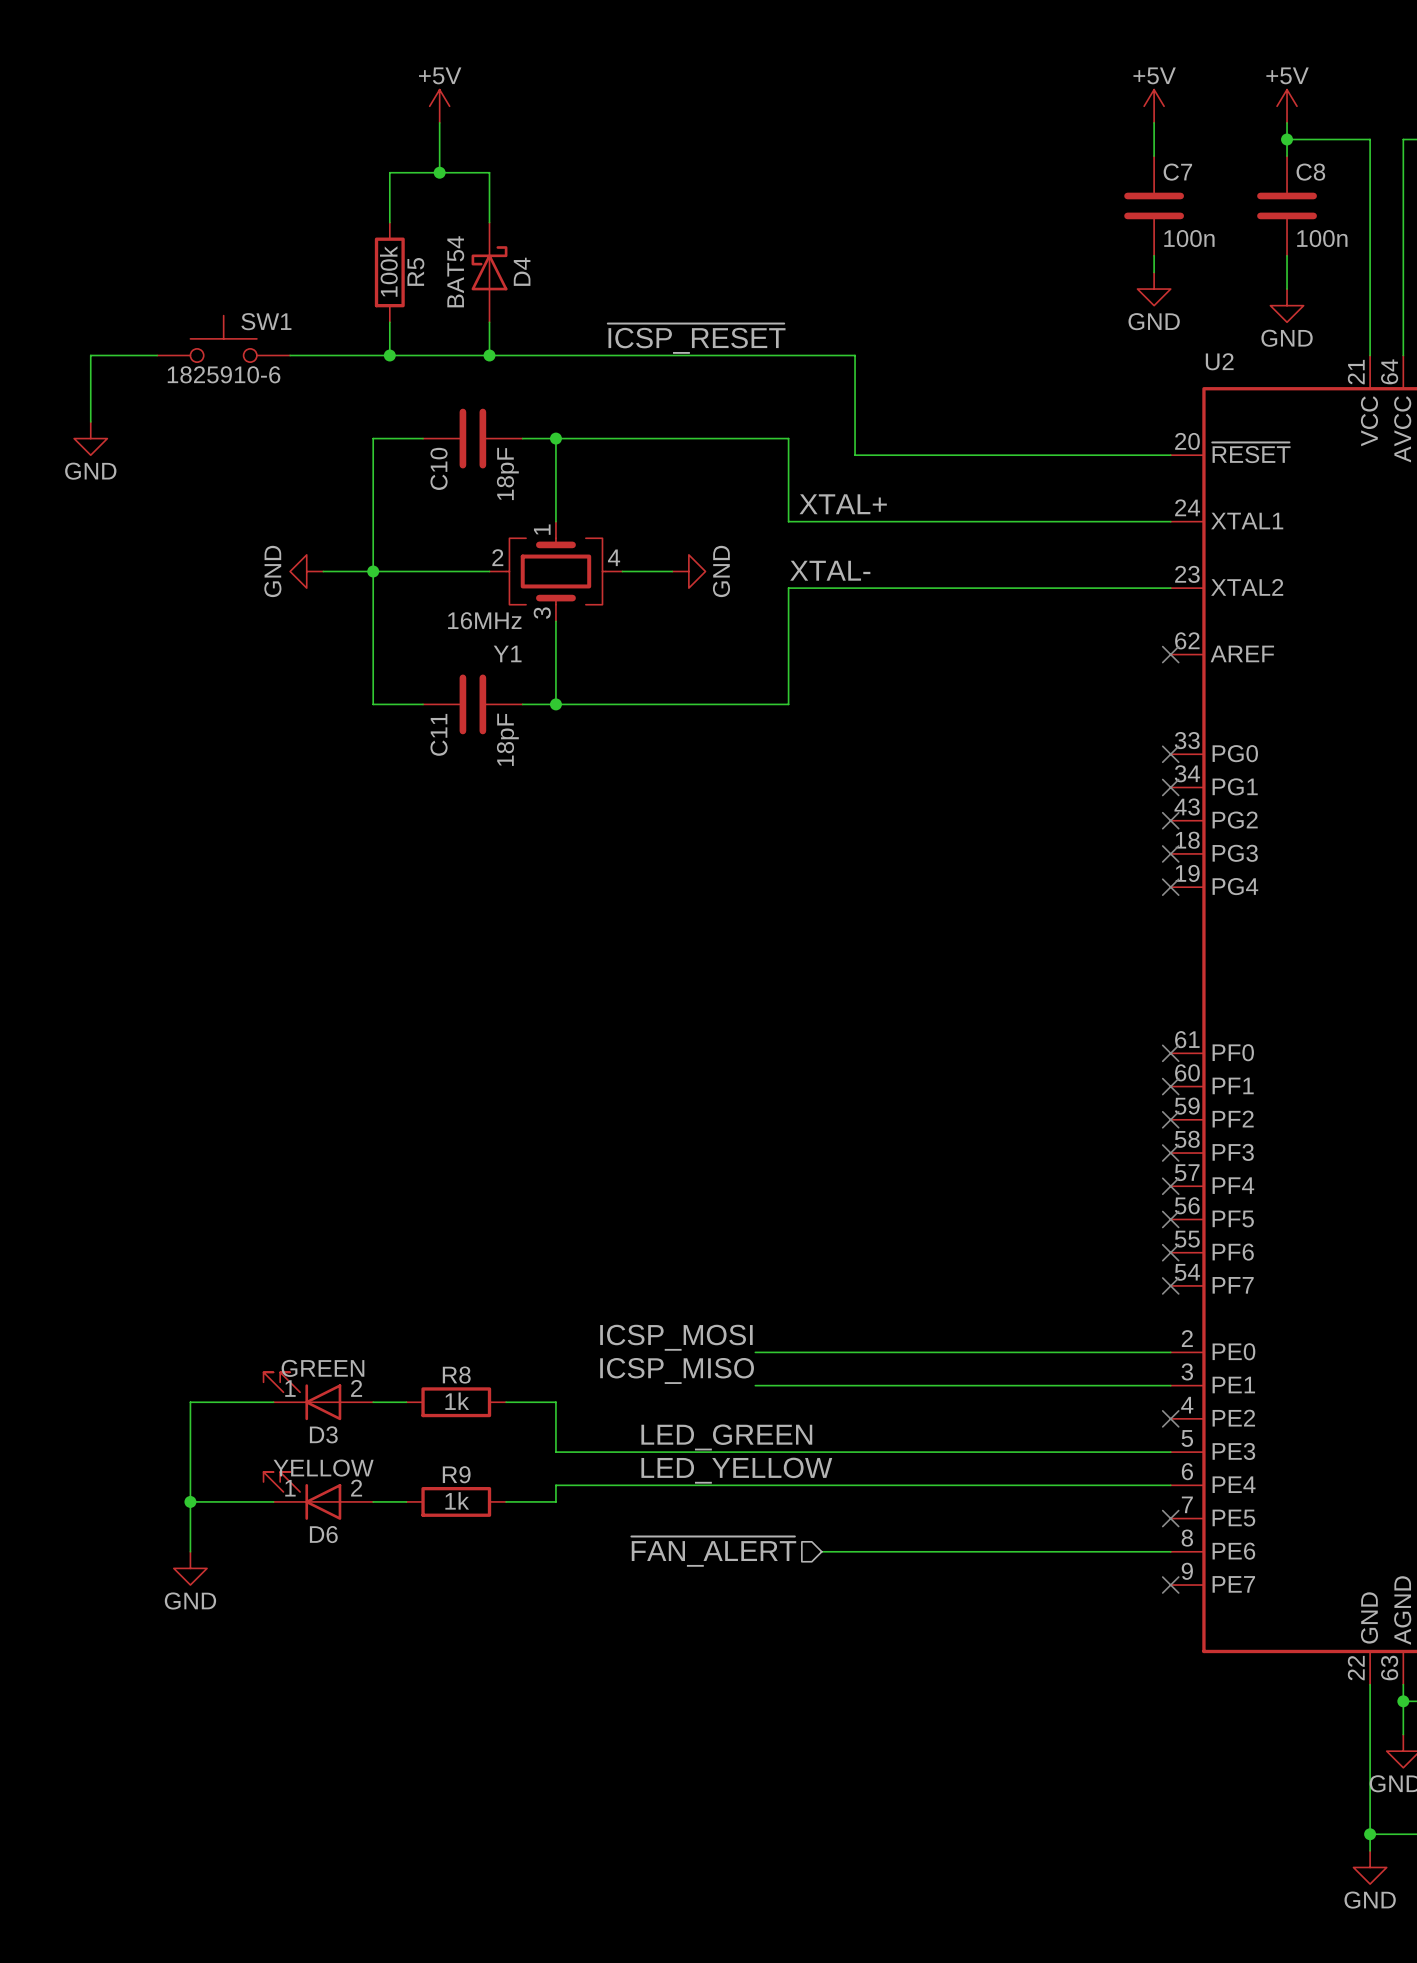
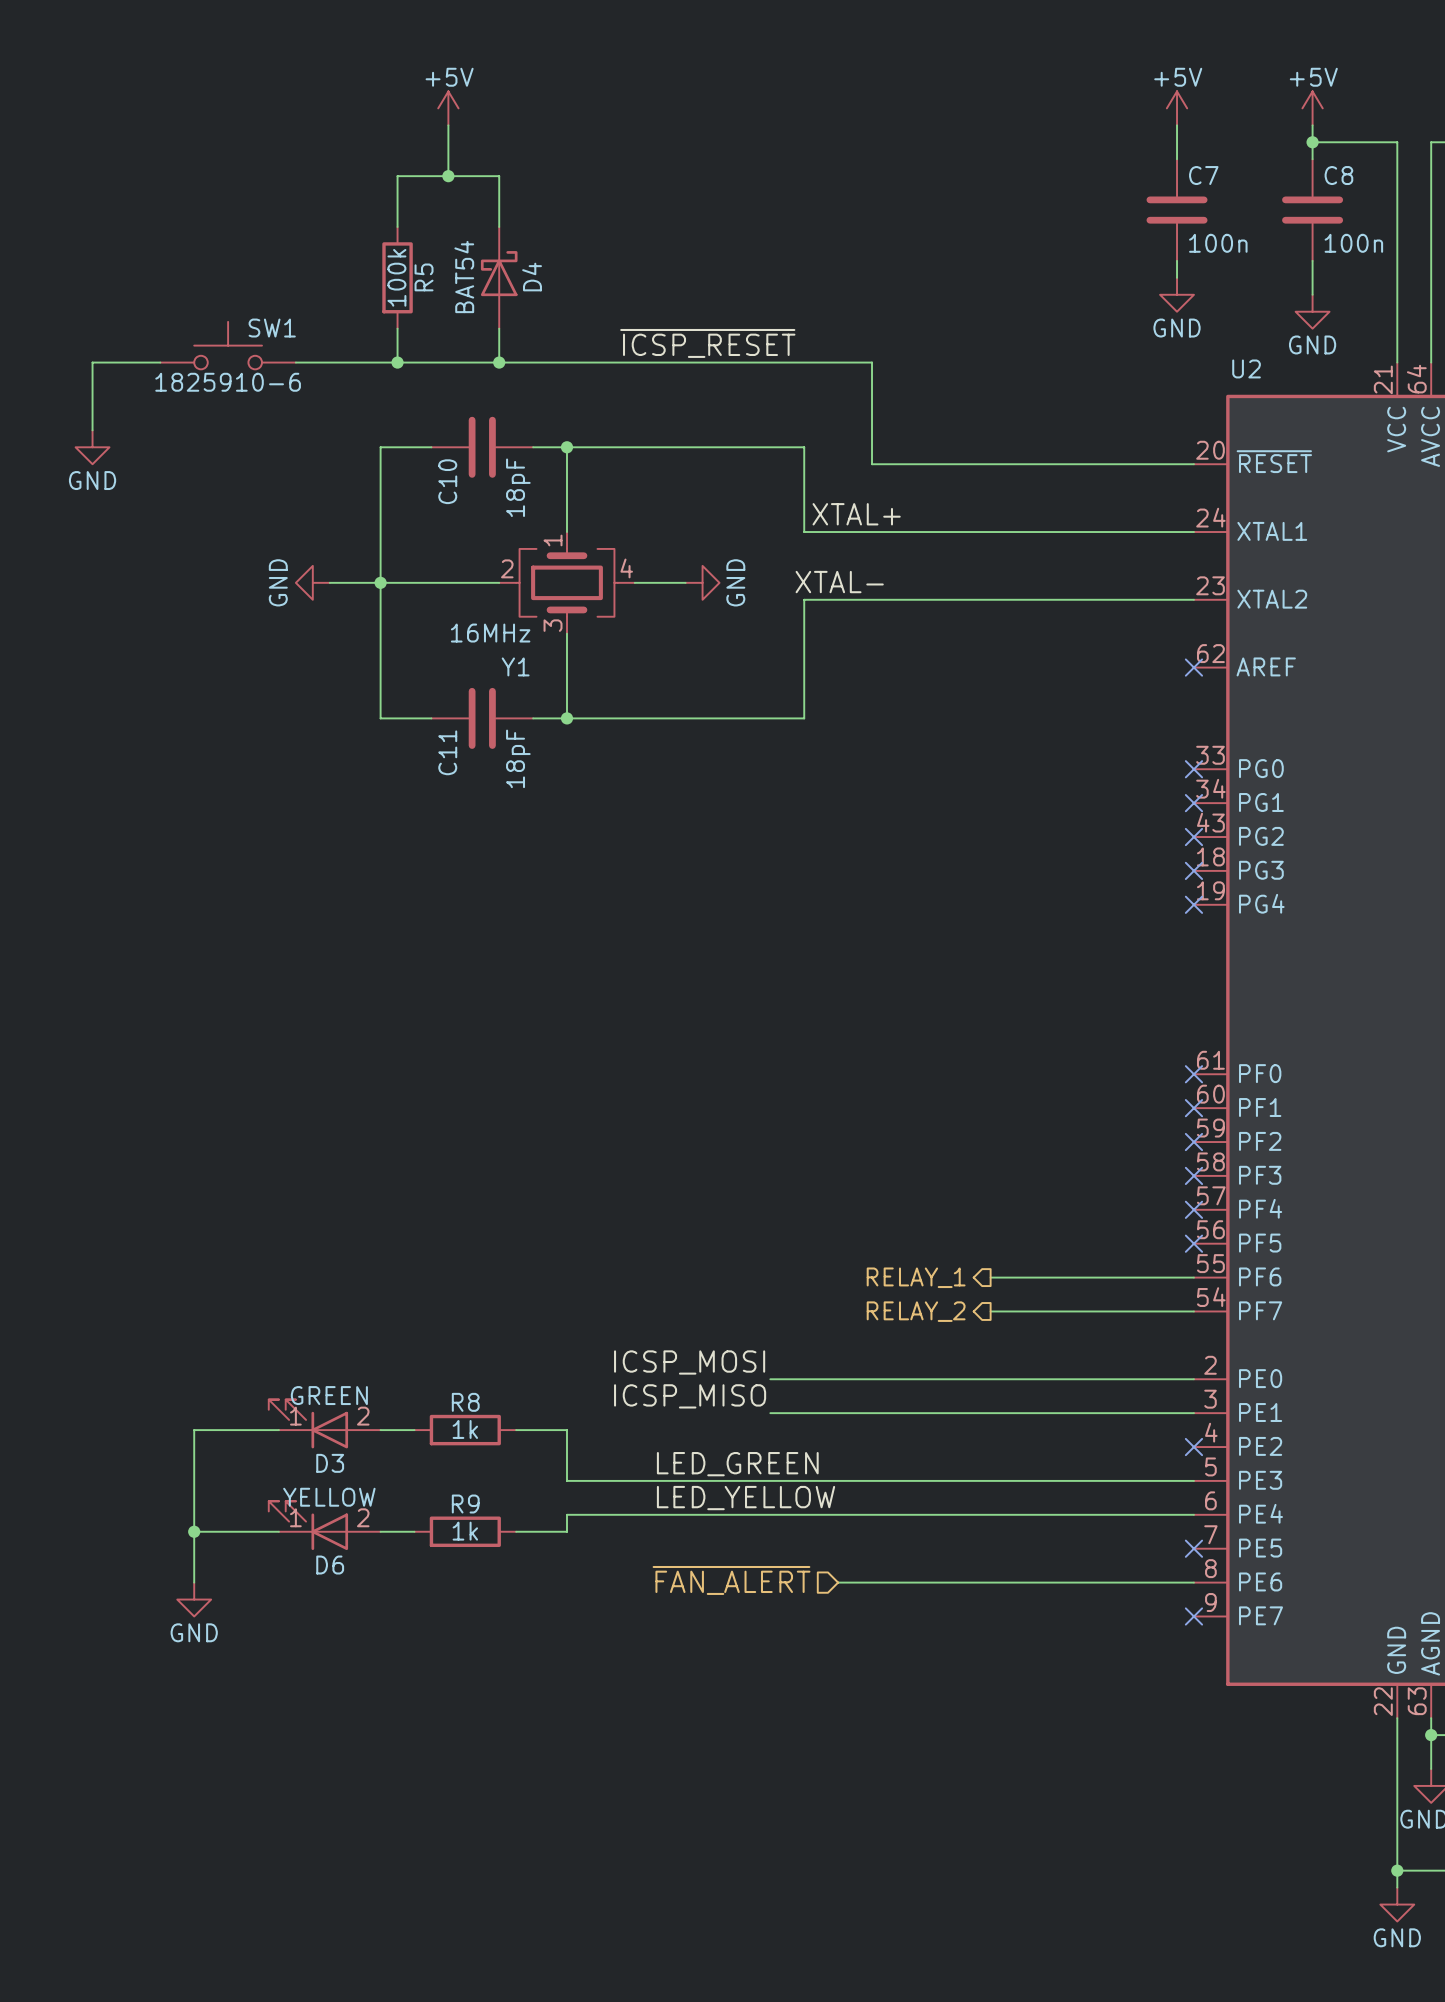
wire: none -> (990, 1277) (1193, 1277)
no-connect mark: (1170, 1252) -> none
hierarchical label: none -> RELAY_1 (916, 1277)
wire: none -> (990, 1311) (1193, 1311)
no-connect mark: (1170, 1285) -> none
hierarchical label: none -> RELAY_2 (916, 1311)

